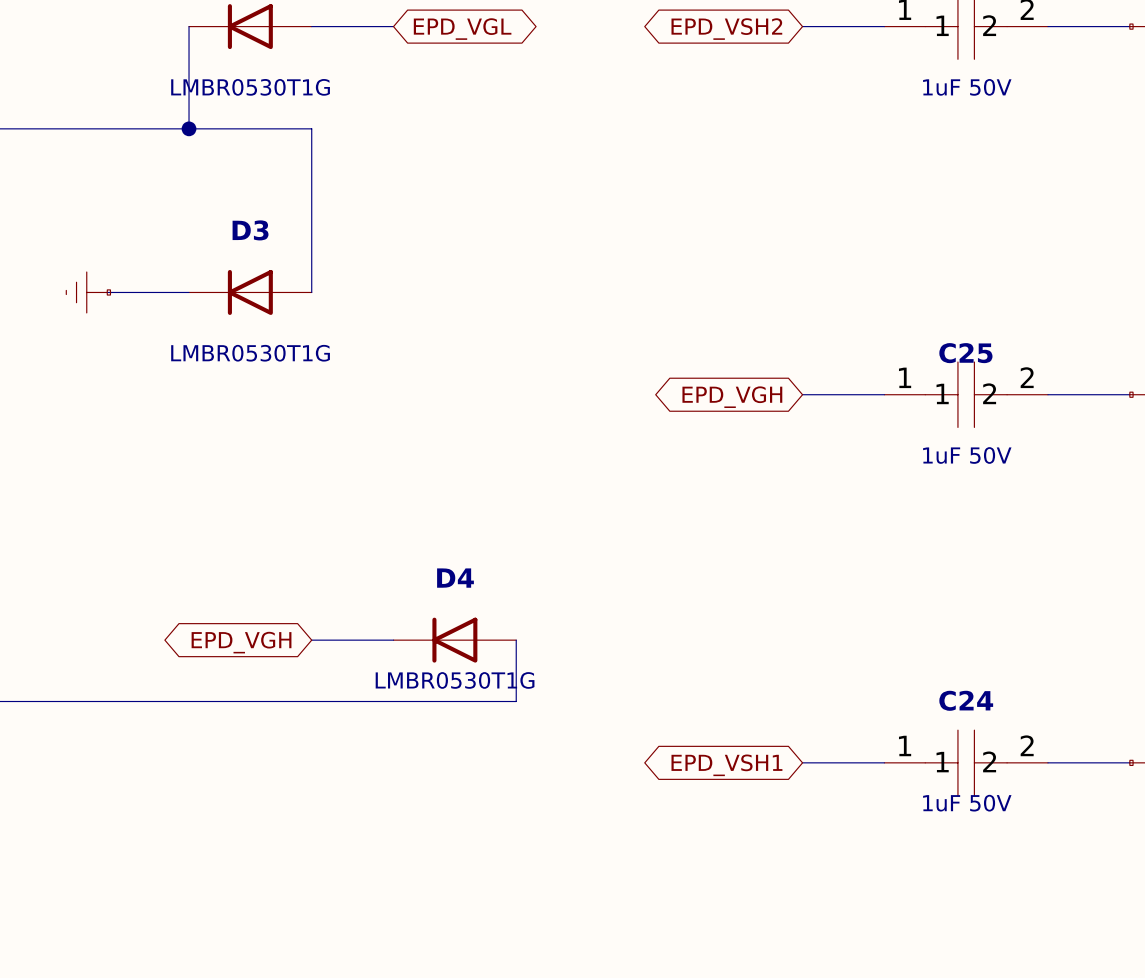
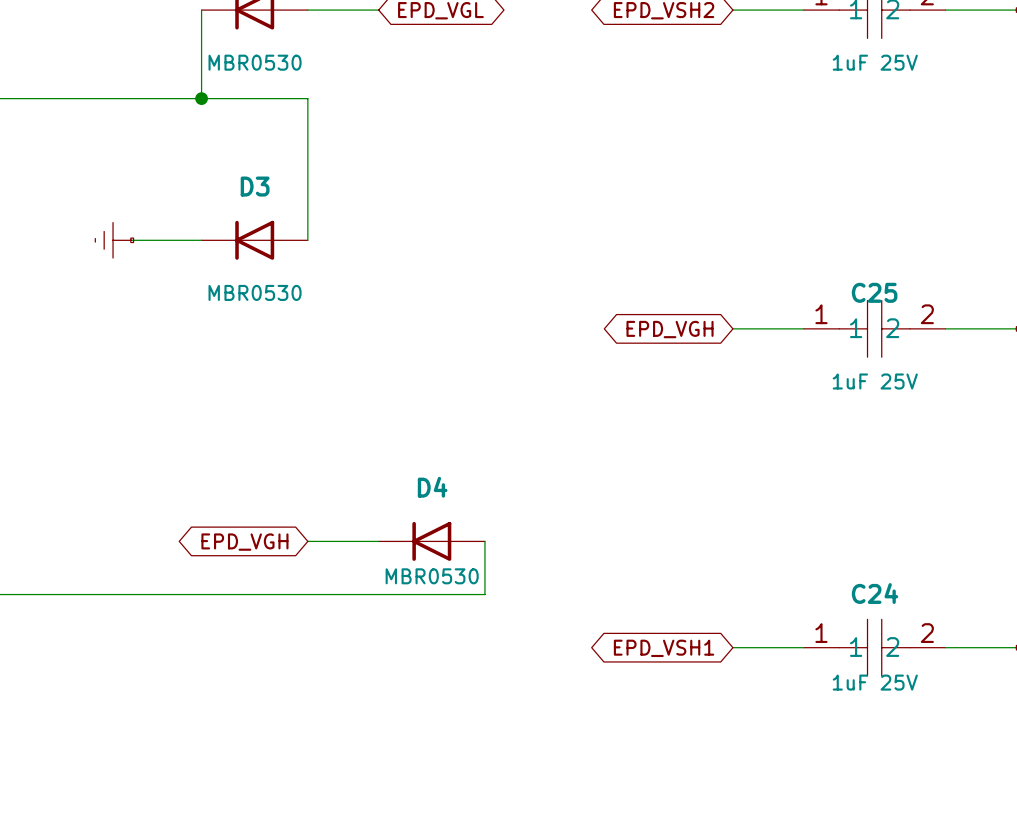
part value: LMBR0530T1G (250, 87) -> MBR0530 (255, 62)
part value: 1uF 50V (967, 87) -> 1uF 25V (875, 62)
D3 value: LMBR0530T1G (250, 353) -> MBR0530 (255, 292)
C25 value: 1uF 50V (967, 455) -> 1uF 25V (875, 381)
D4 value: LMBR0530T1G (455, 680) -> MBR0530 (432, 576)
C24 value: 1uF 50V (967, 803) -> 1uF 25V (875, 682)

